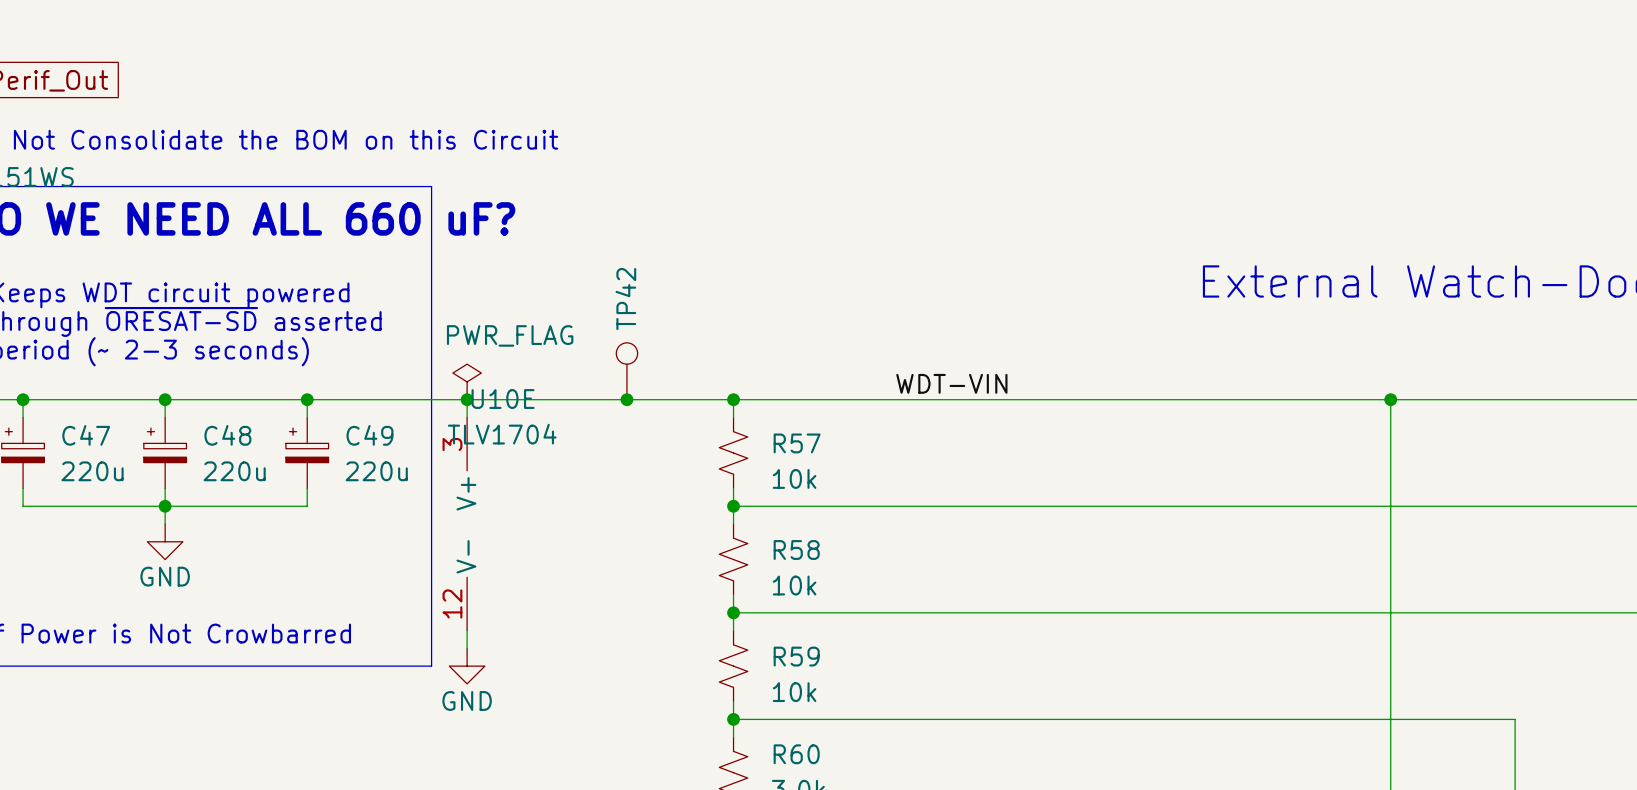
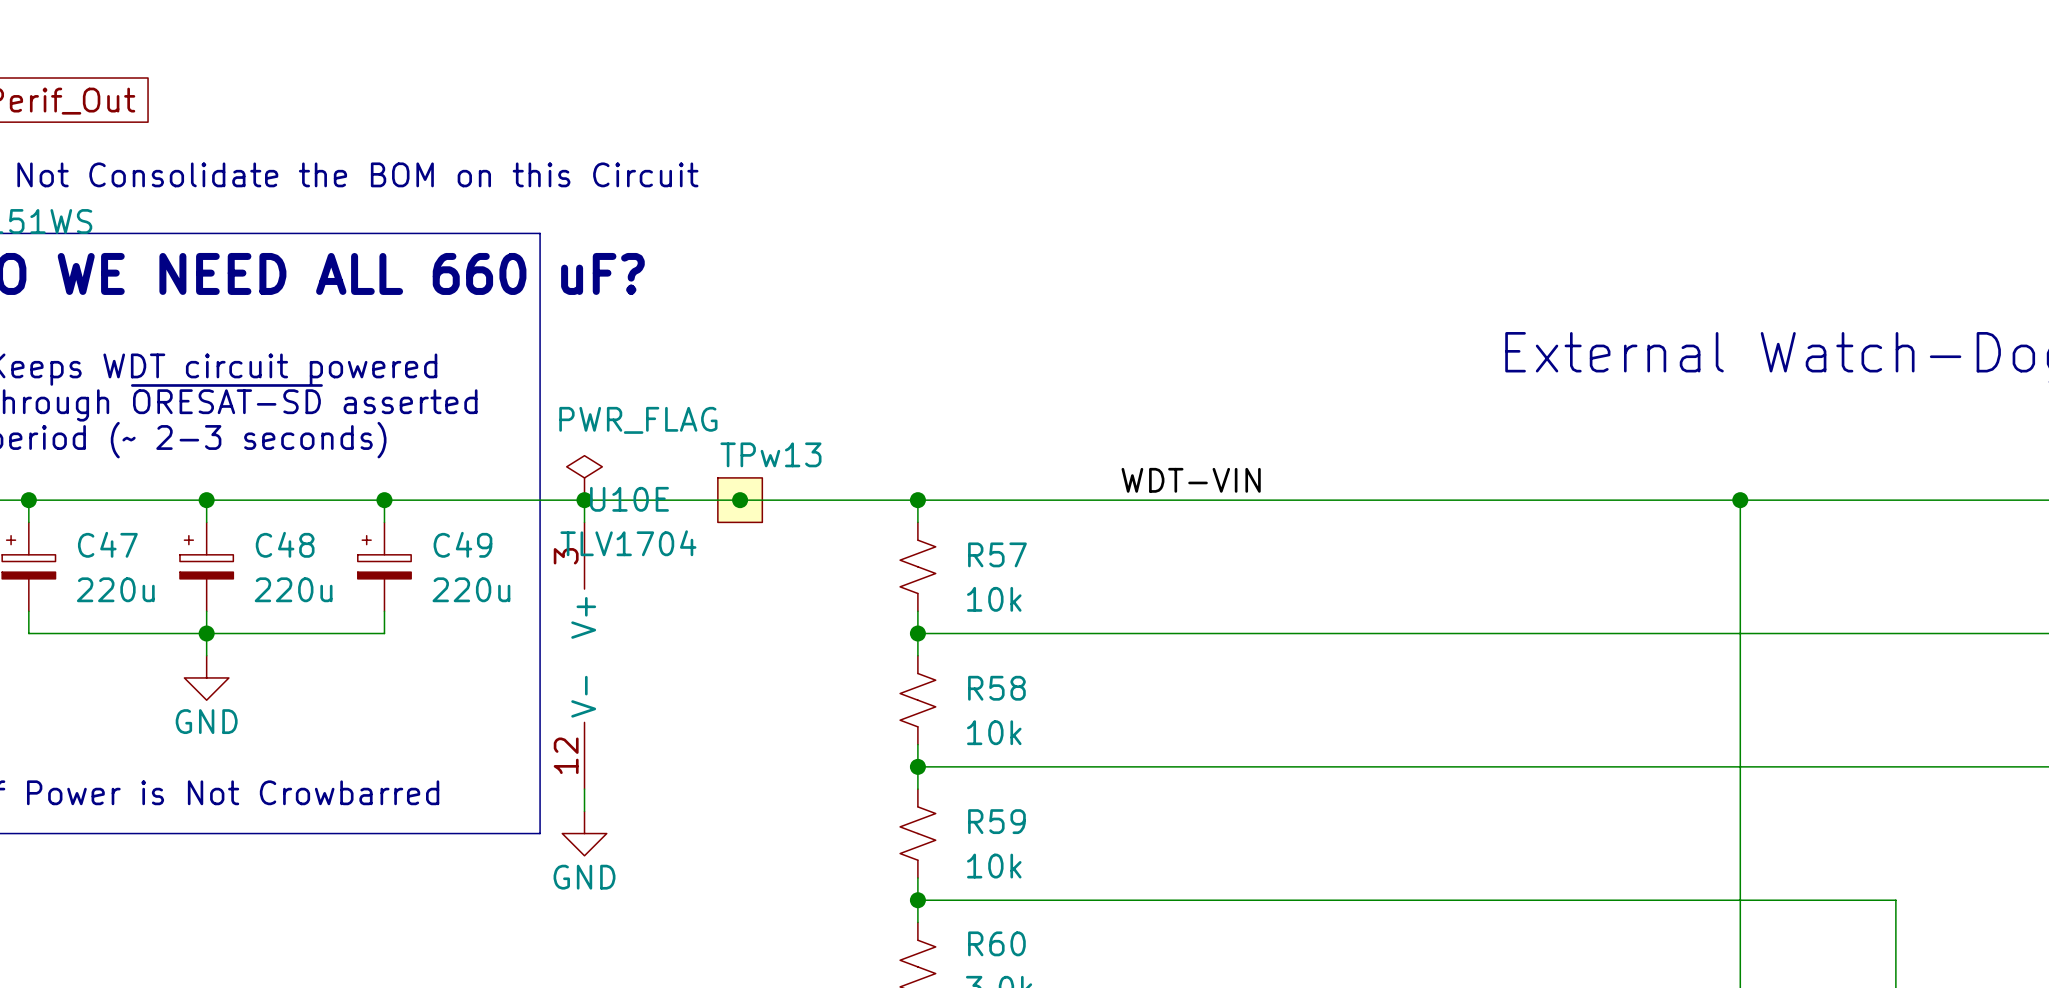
TP42: (626, 371) -> none
TPw13: none -> (740, 500)
junction position: (626, 399) -> (740, 500)

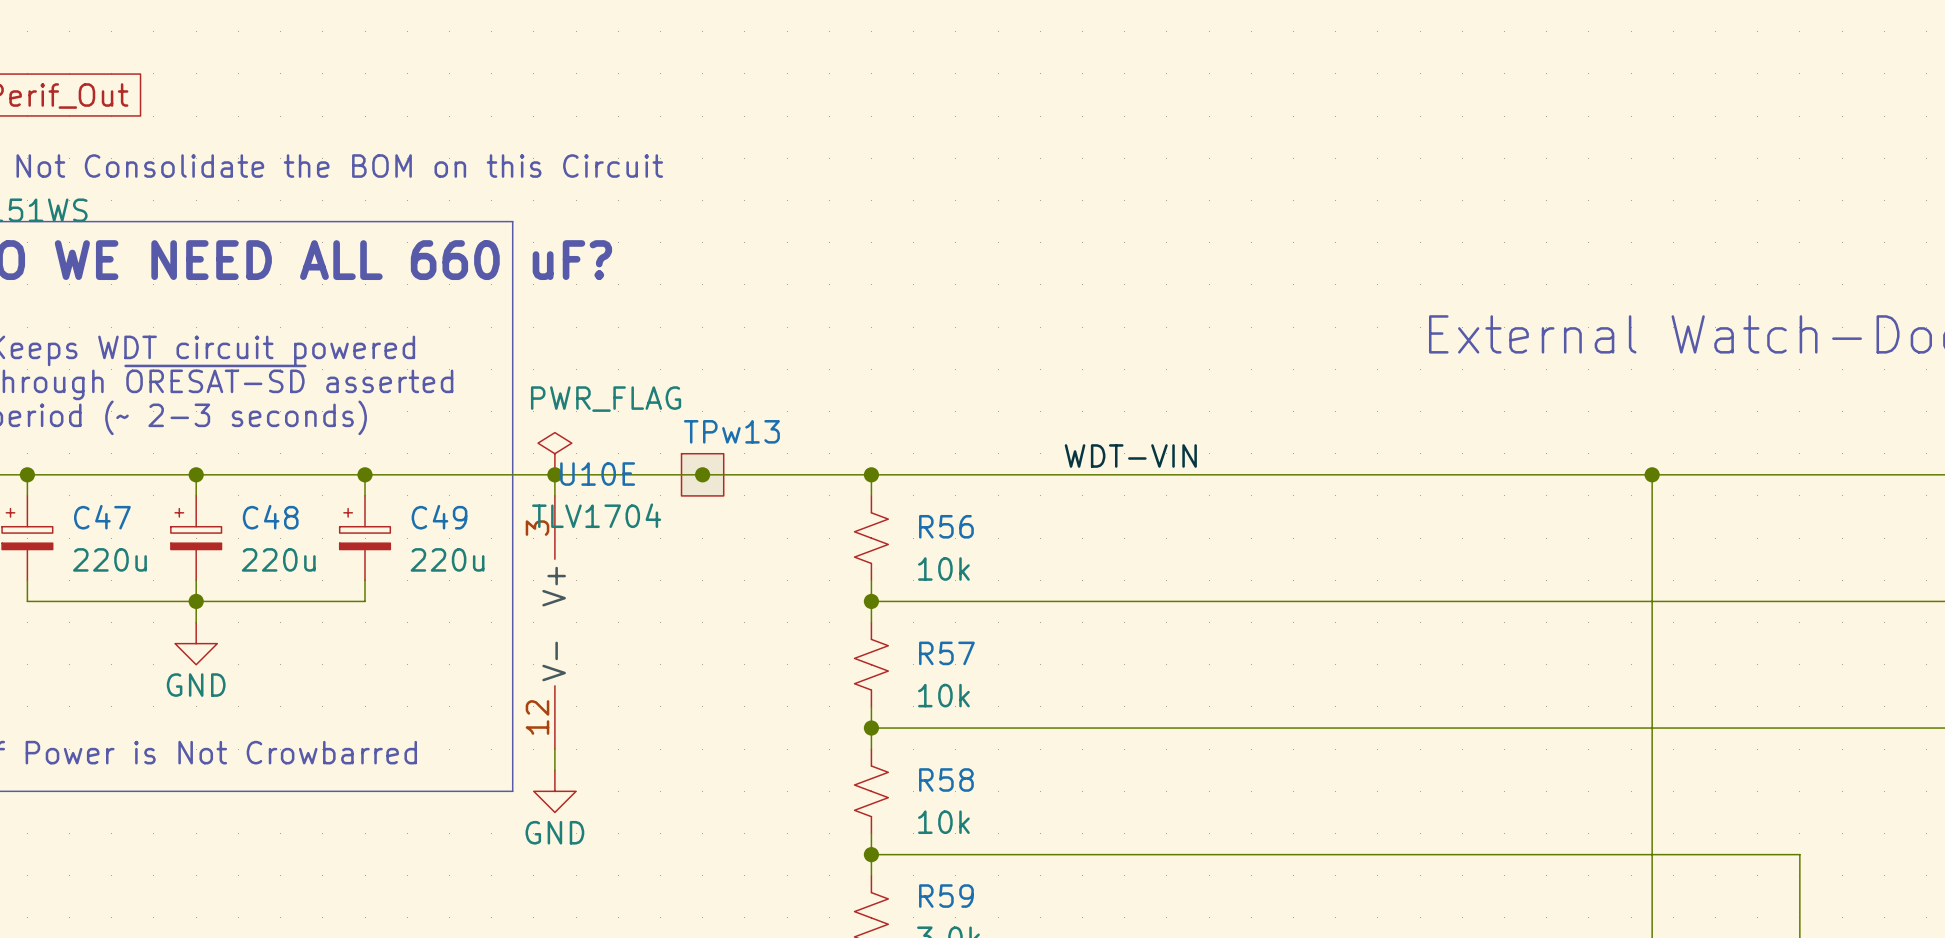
R57 name: R57 (997, 554) -> R56 (946, 526)
R58 name: R58 (996, 688) -> R57 (946, 653)
R59 name: R59 (996, 821) -> R58 (946, 779)
R60 name: R60 (996, 943) -> R59 (946, 896)

